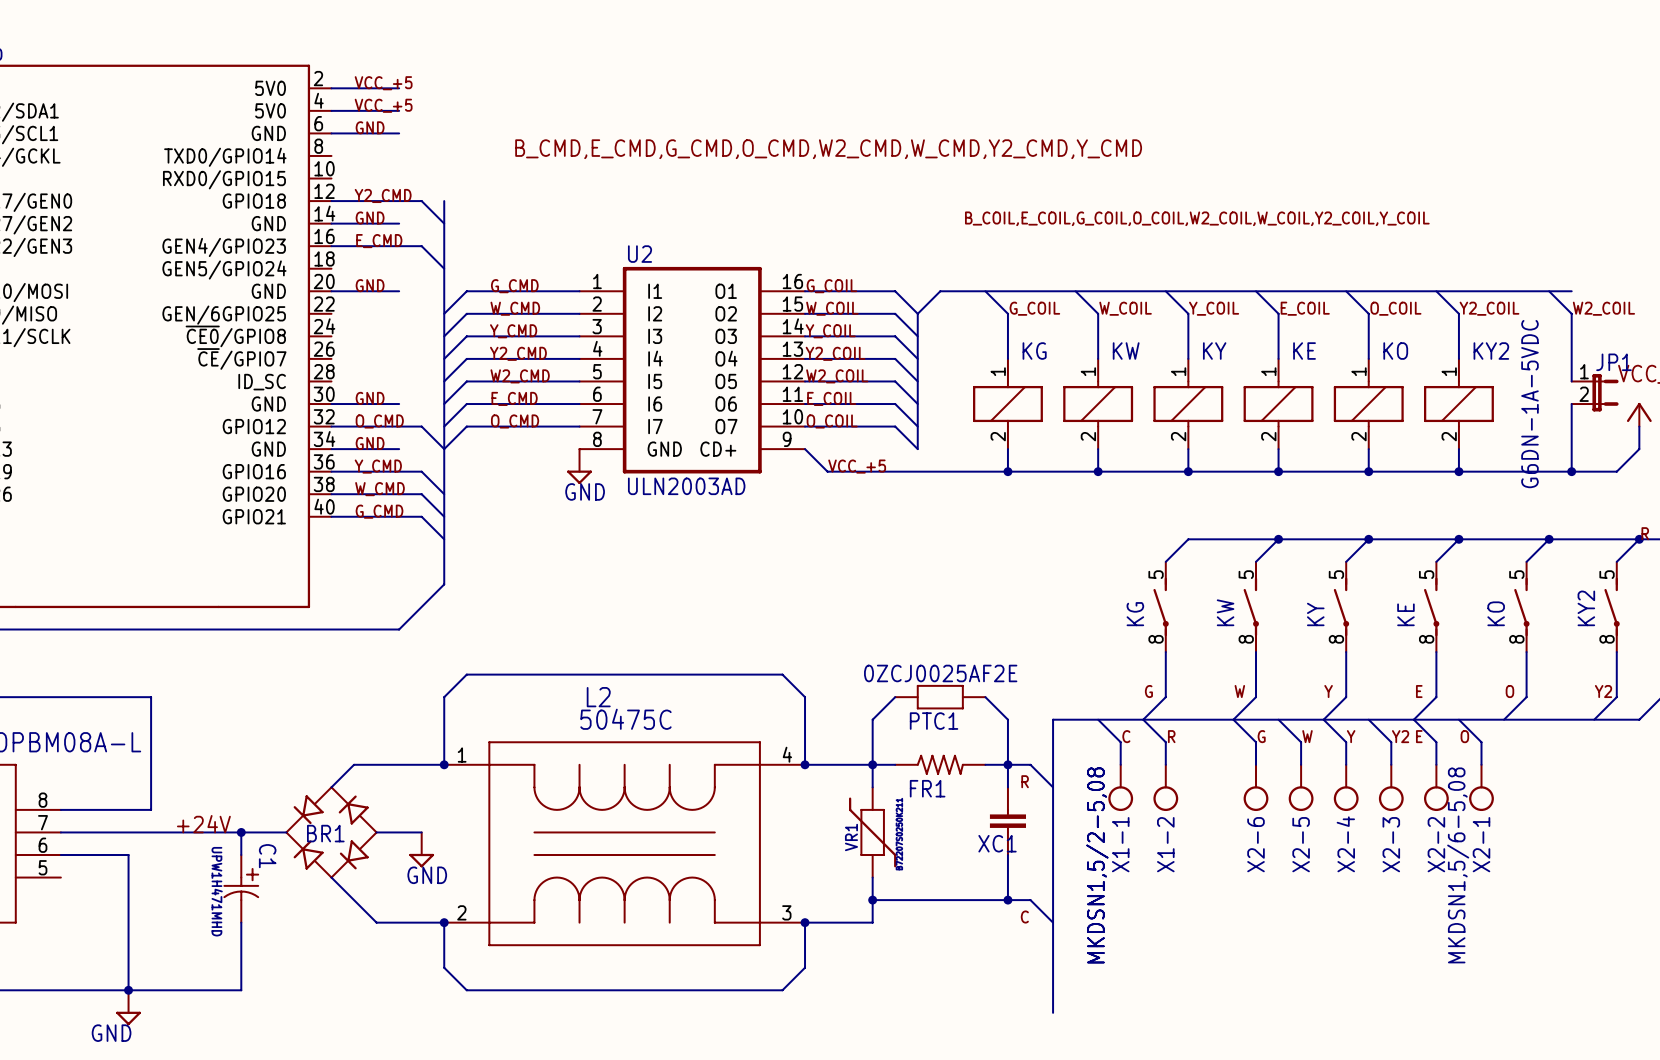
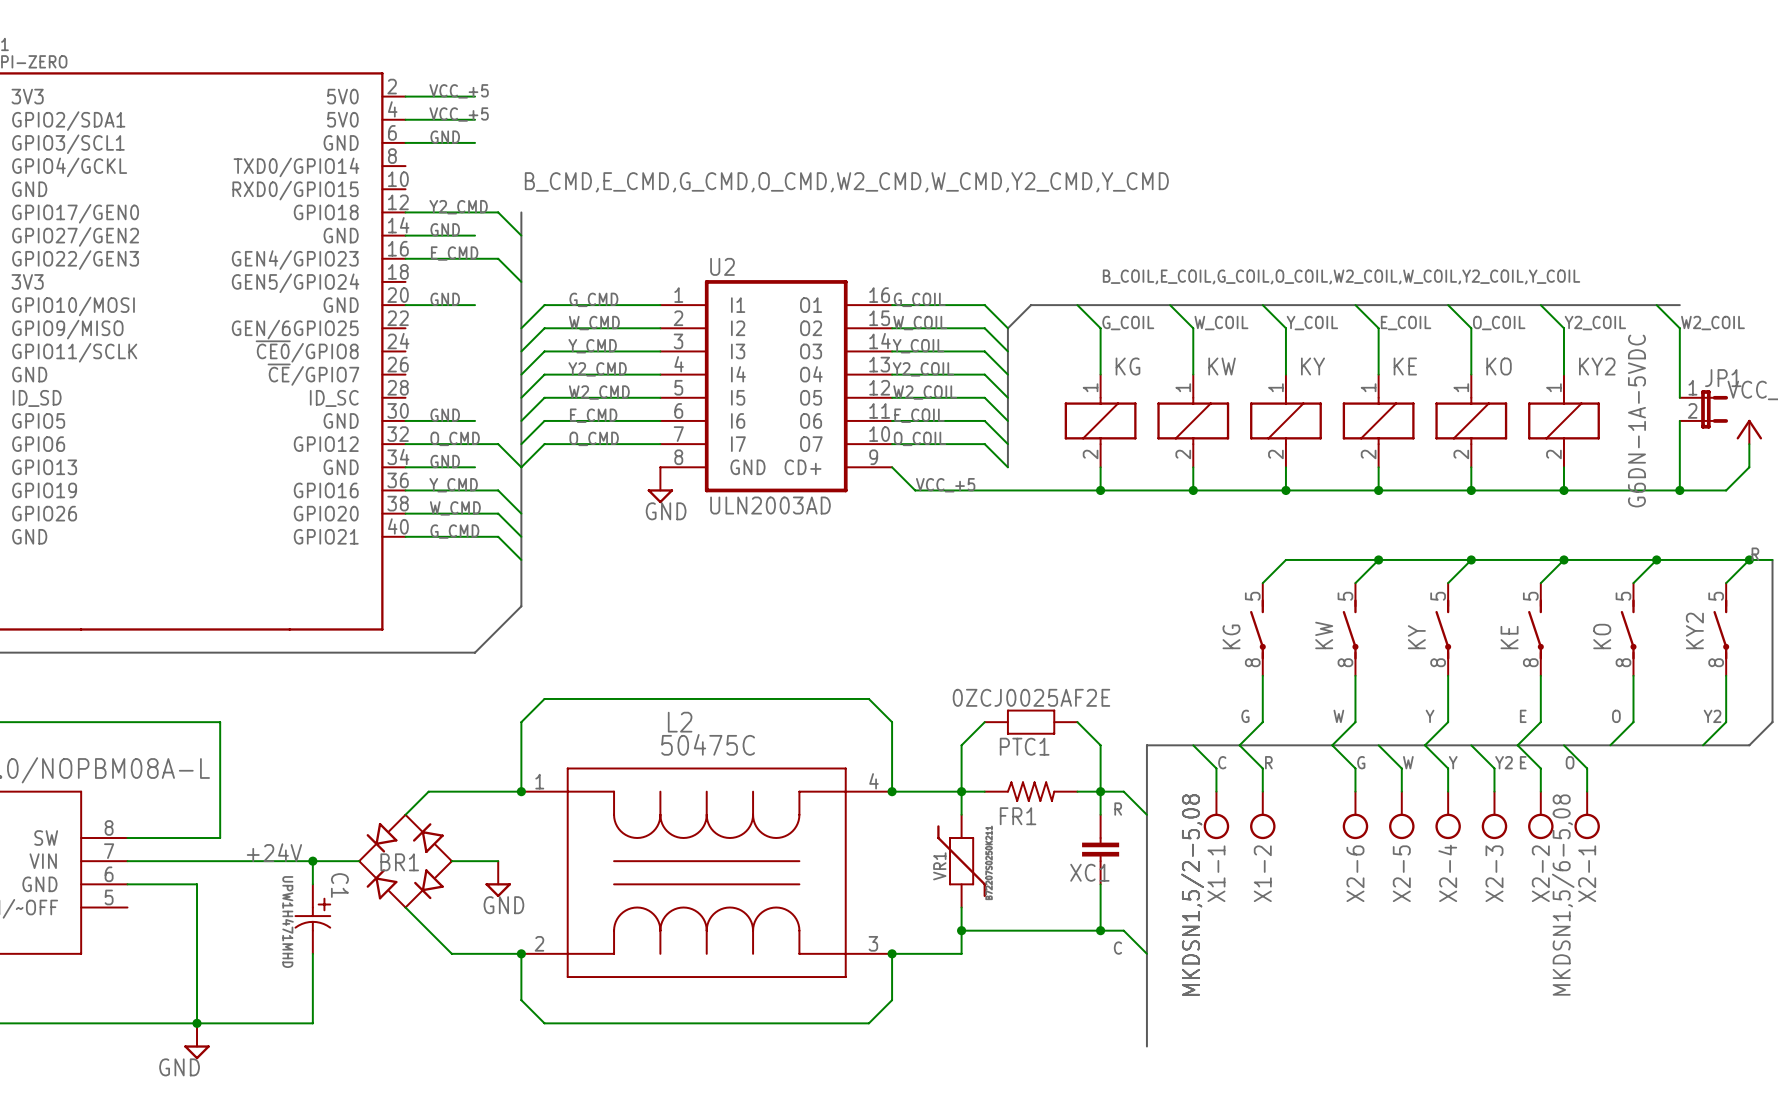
label position: B_CMD,E_CMD,G_CMD,O_CMD,W2_CMD,W_CMD,Y2_CMD,Y_CMD (828, 149) -> B_CMD,E_CMD,G_CMD,O_CMD,W2_CMD,W_CMD,Y2_CMD,Y_CMD (846, 182)
label position: B_COIL,E_COIL,G_COIL,O_COIL,W2_COIL,W_COIL,Y2_COIL,Y_COIL (1197, 218) -> B_COIL,E_COIL,G_COIL,O_COIL,W2_COIL,W_COIL,Y2_COIL,Y_COIL (1341, 276)

